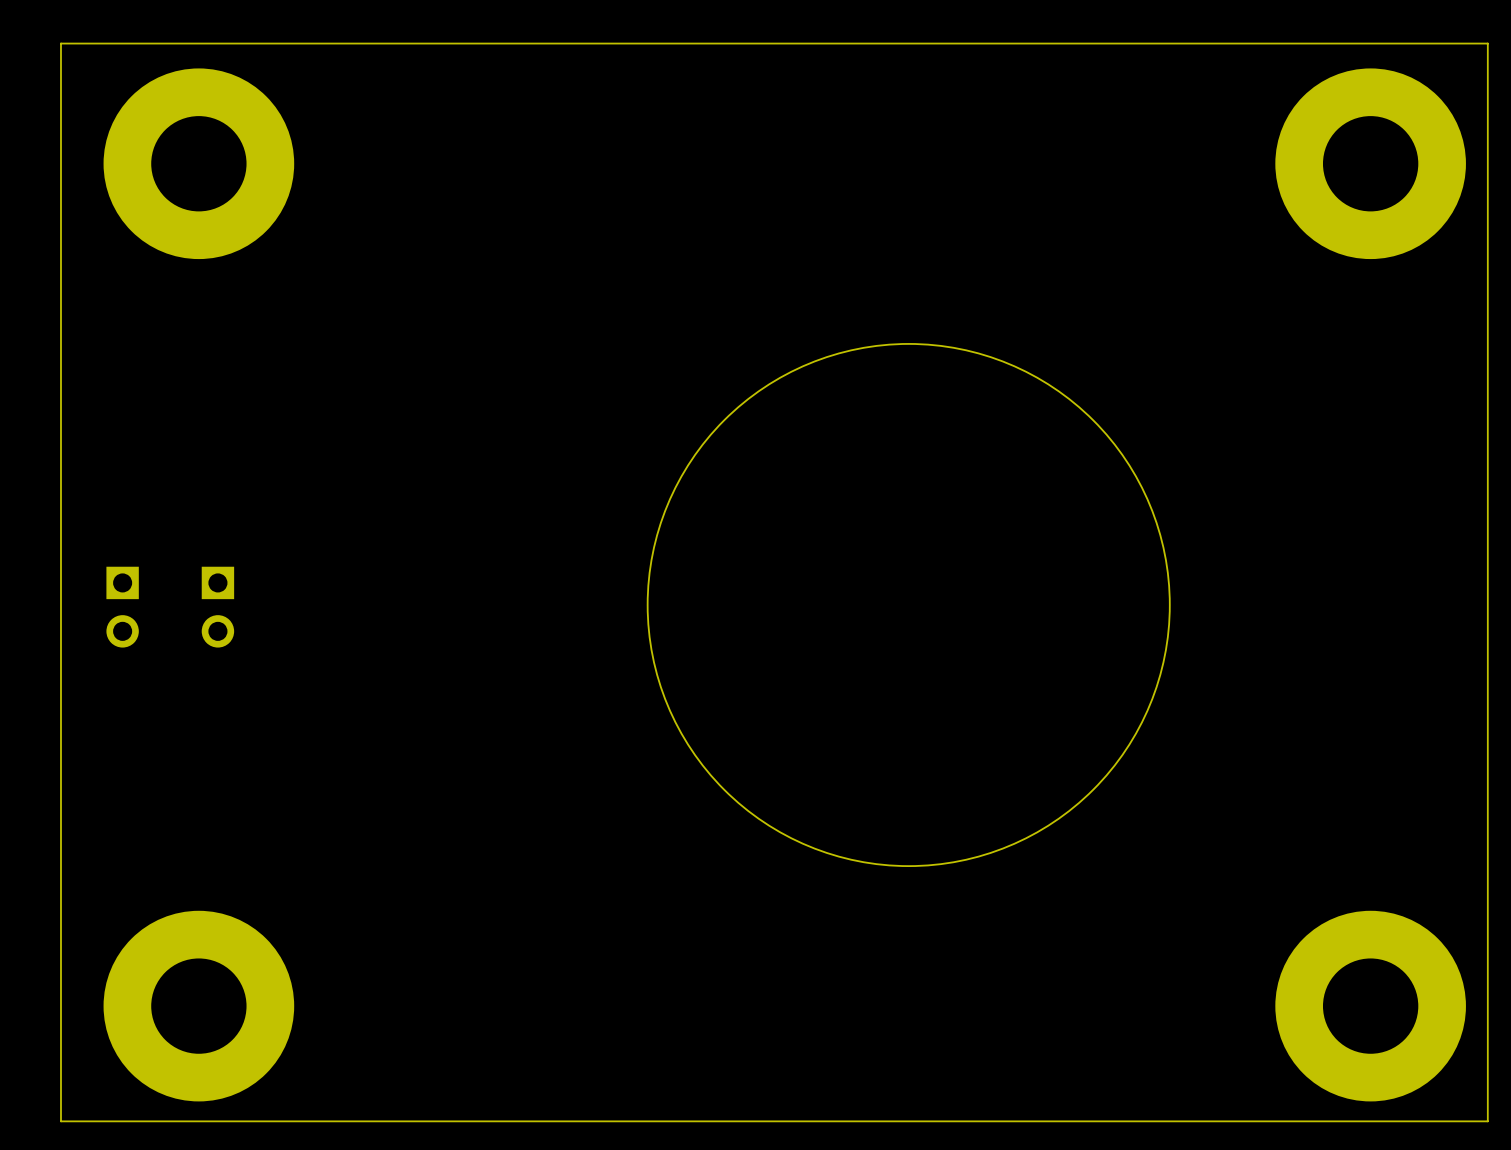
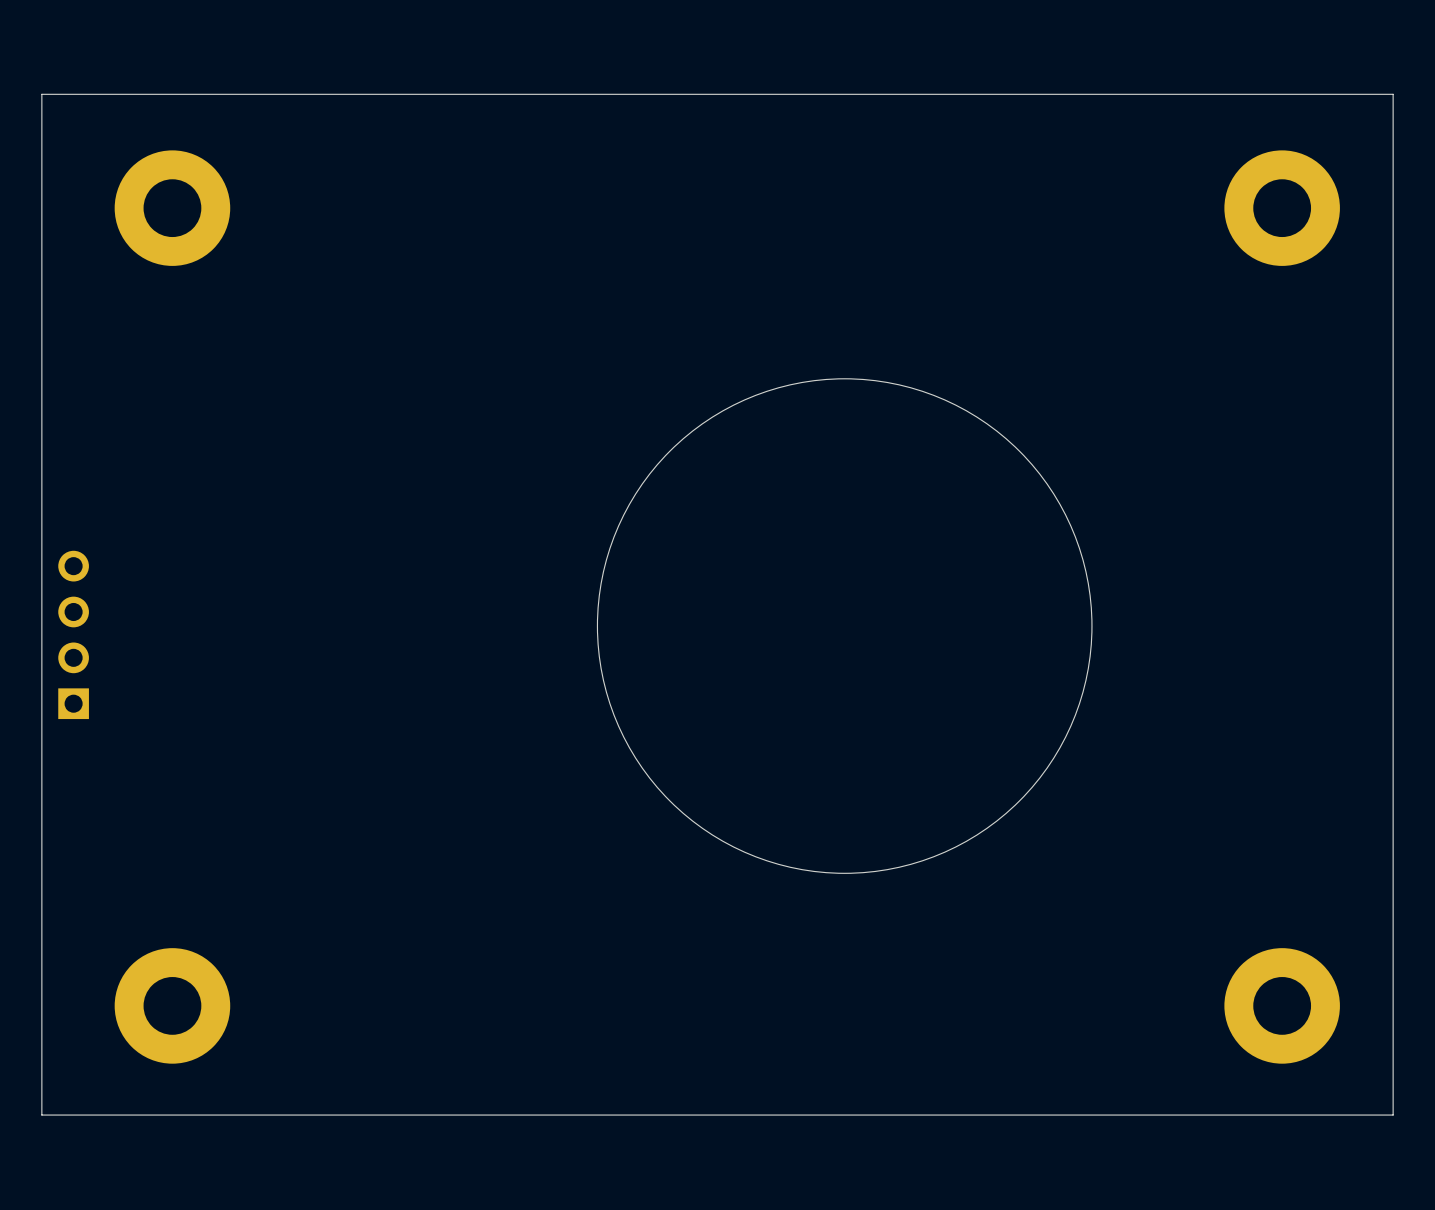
part footprint: [103, 68, 295, 260] -> [114, 150, 231, 266]
part footprint: [1275, 68, 1466, 260] -> [1224, 150, 1340, 266]
part: (122, 607) -> none
part: (217, 607) -> none
part: none -> (73, 634)
part footprint: [103, 910, 295, 1102] -> [114, 948, 231, 1064]
part footprint: [1275, 910, 1466, 1102] -> [1224, 948, 1340, 1064]

